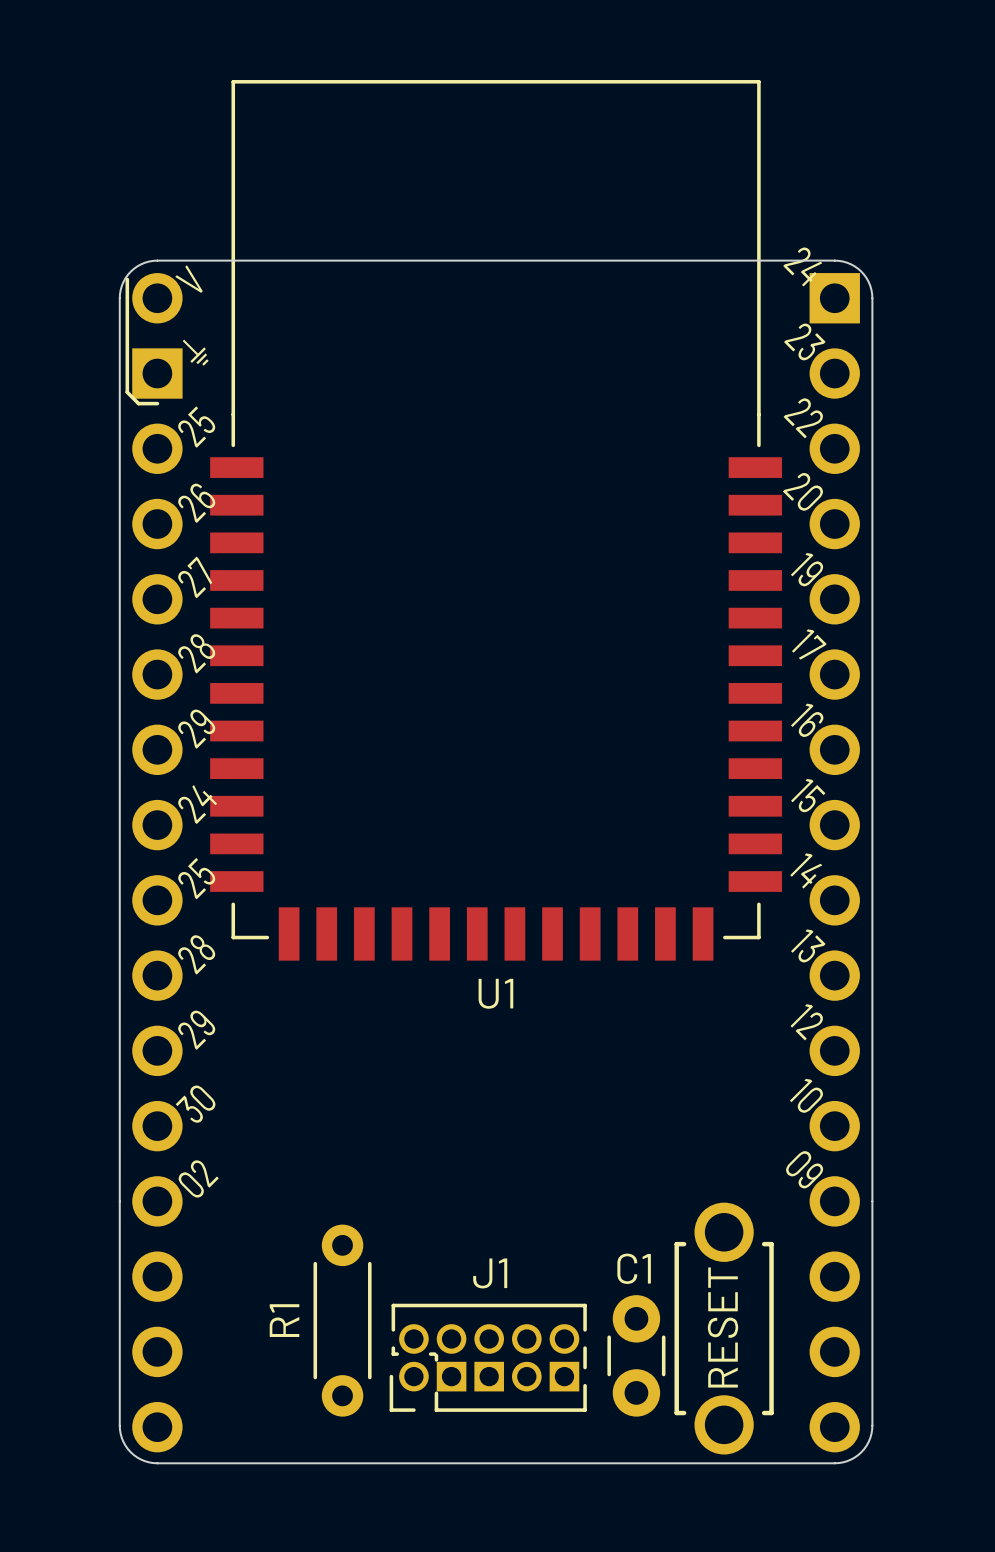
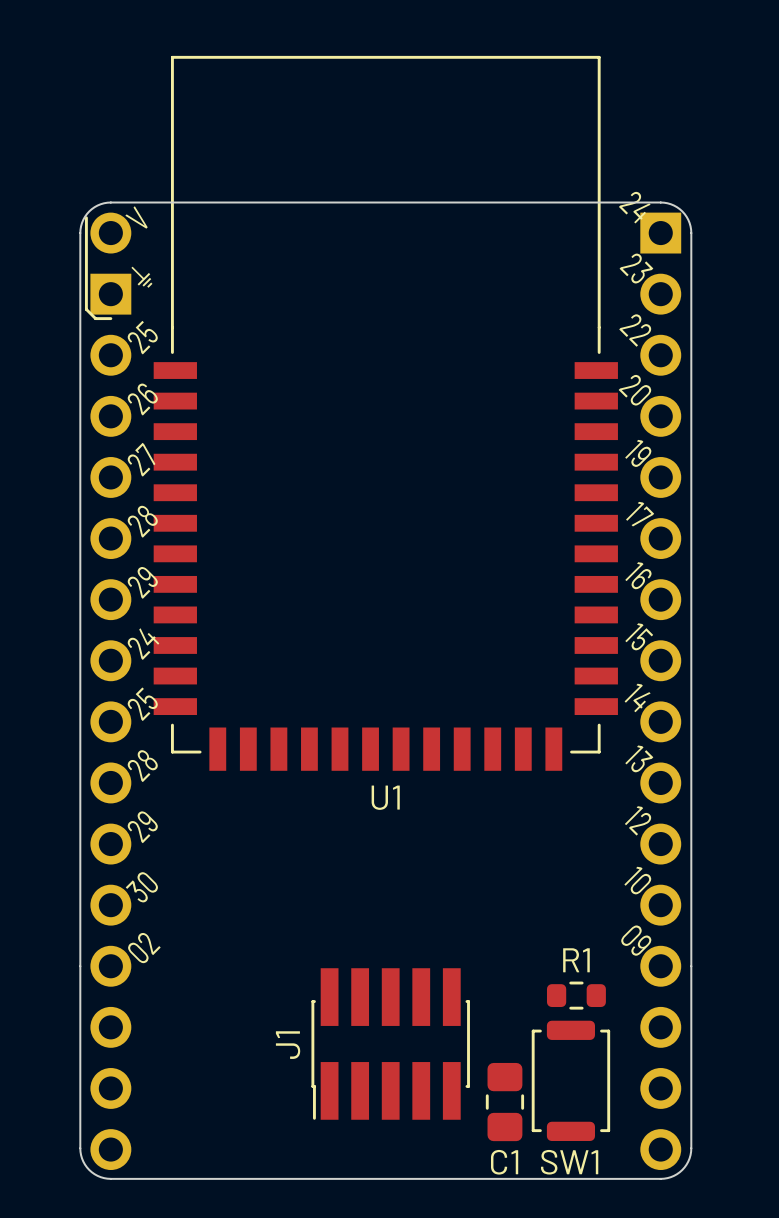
R1 footprint: [313, 1224, 372, 1417] -> [546, 981, 606, 1010]
C1 name position: C1 (634, 1268) -> C1 (504, 1162)
J1 name position: J1 (490, 1273) -> J1 (288, 1045)
C1 footprint: [607, 1295, 666, 1417] -> [485, 1062, 525, 1142]
J1 footprint: [389, 1303, 587, 1412] -> [311, 968, 470, 1120]
R1 name position: R1 (284, 1320) -> R1 (576, 960)
part: (724, 1328) -> none
SW1: none -> (570, 1080)

